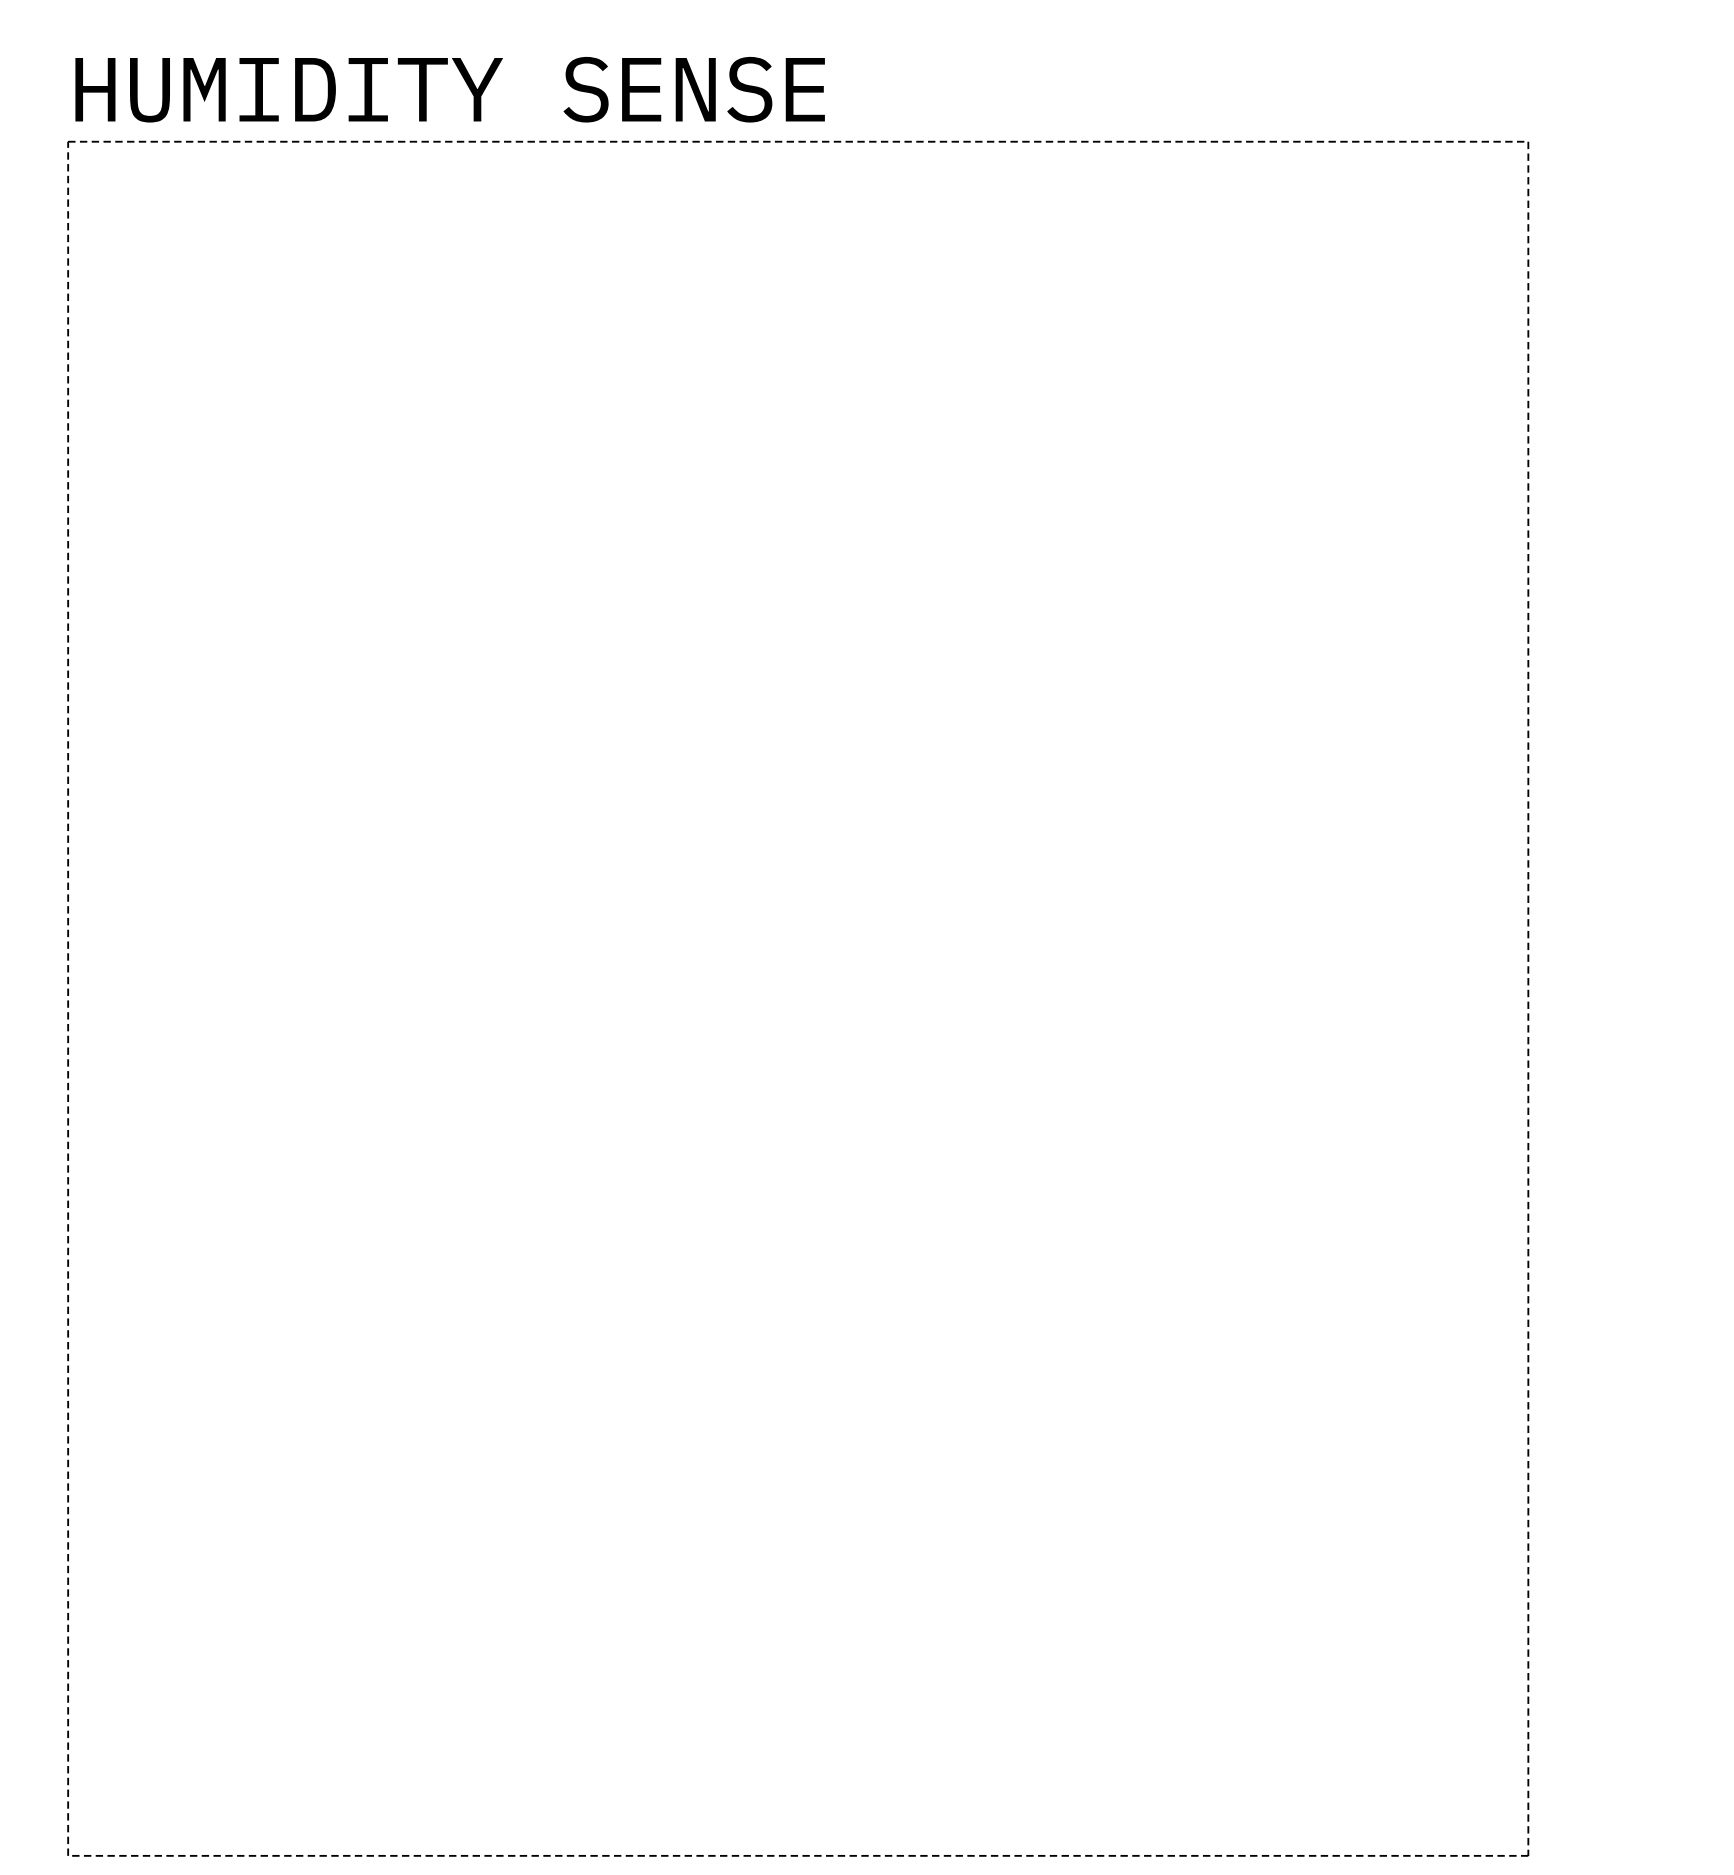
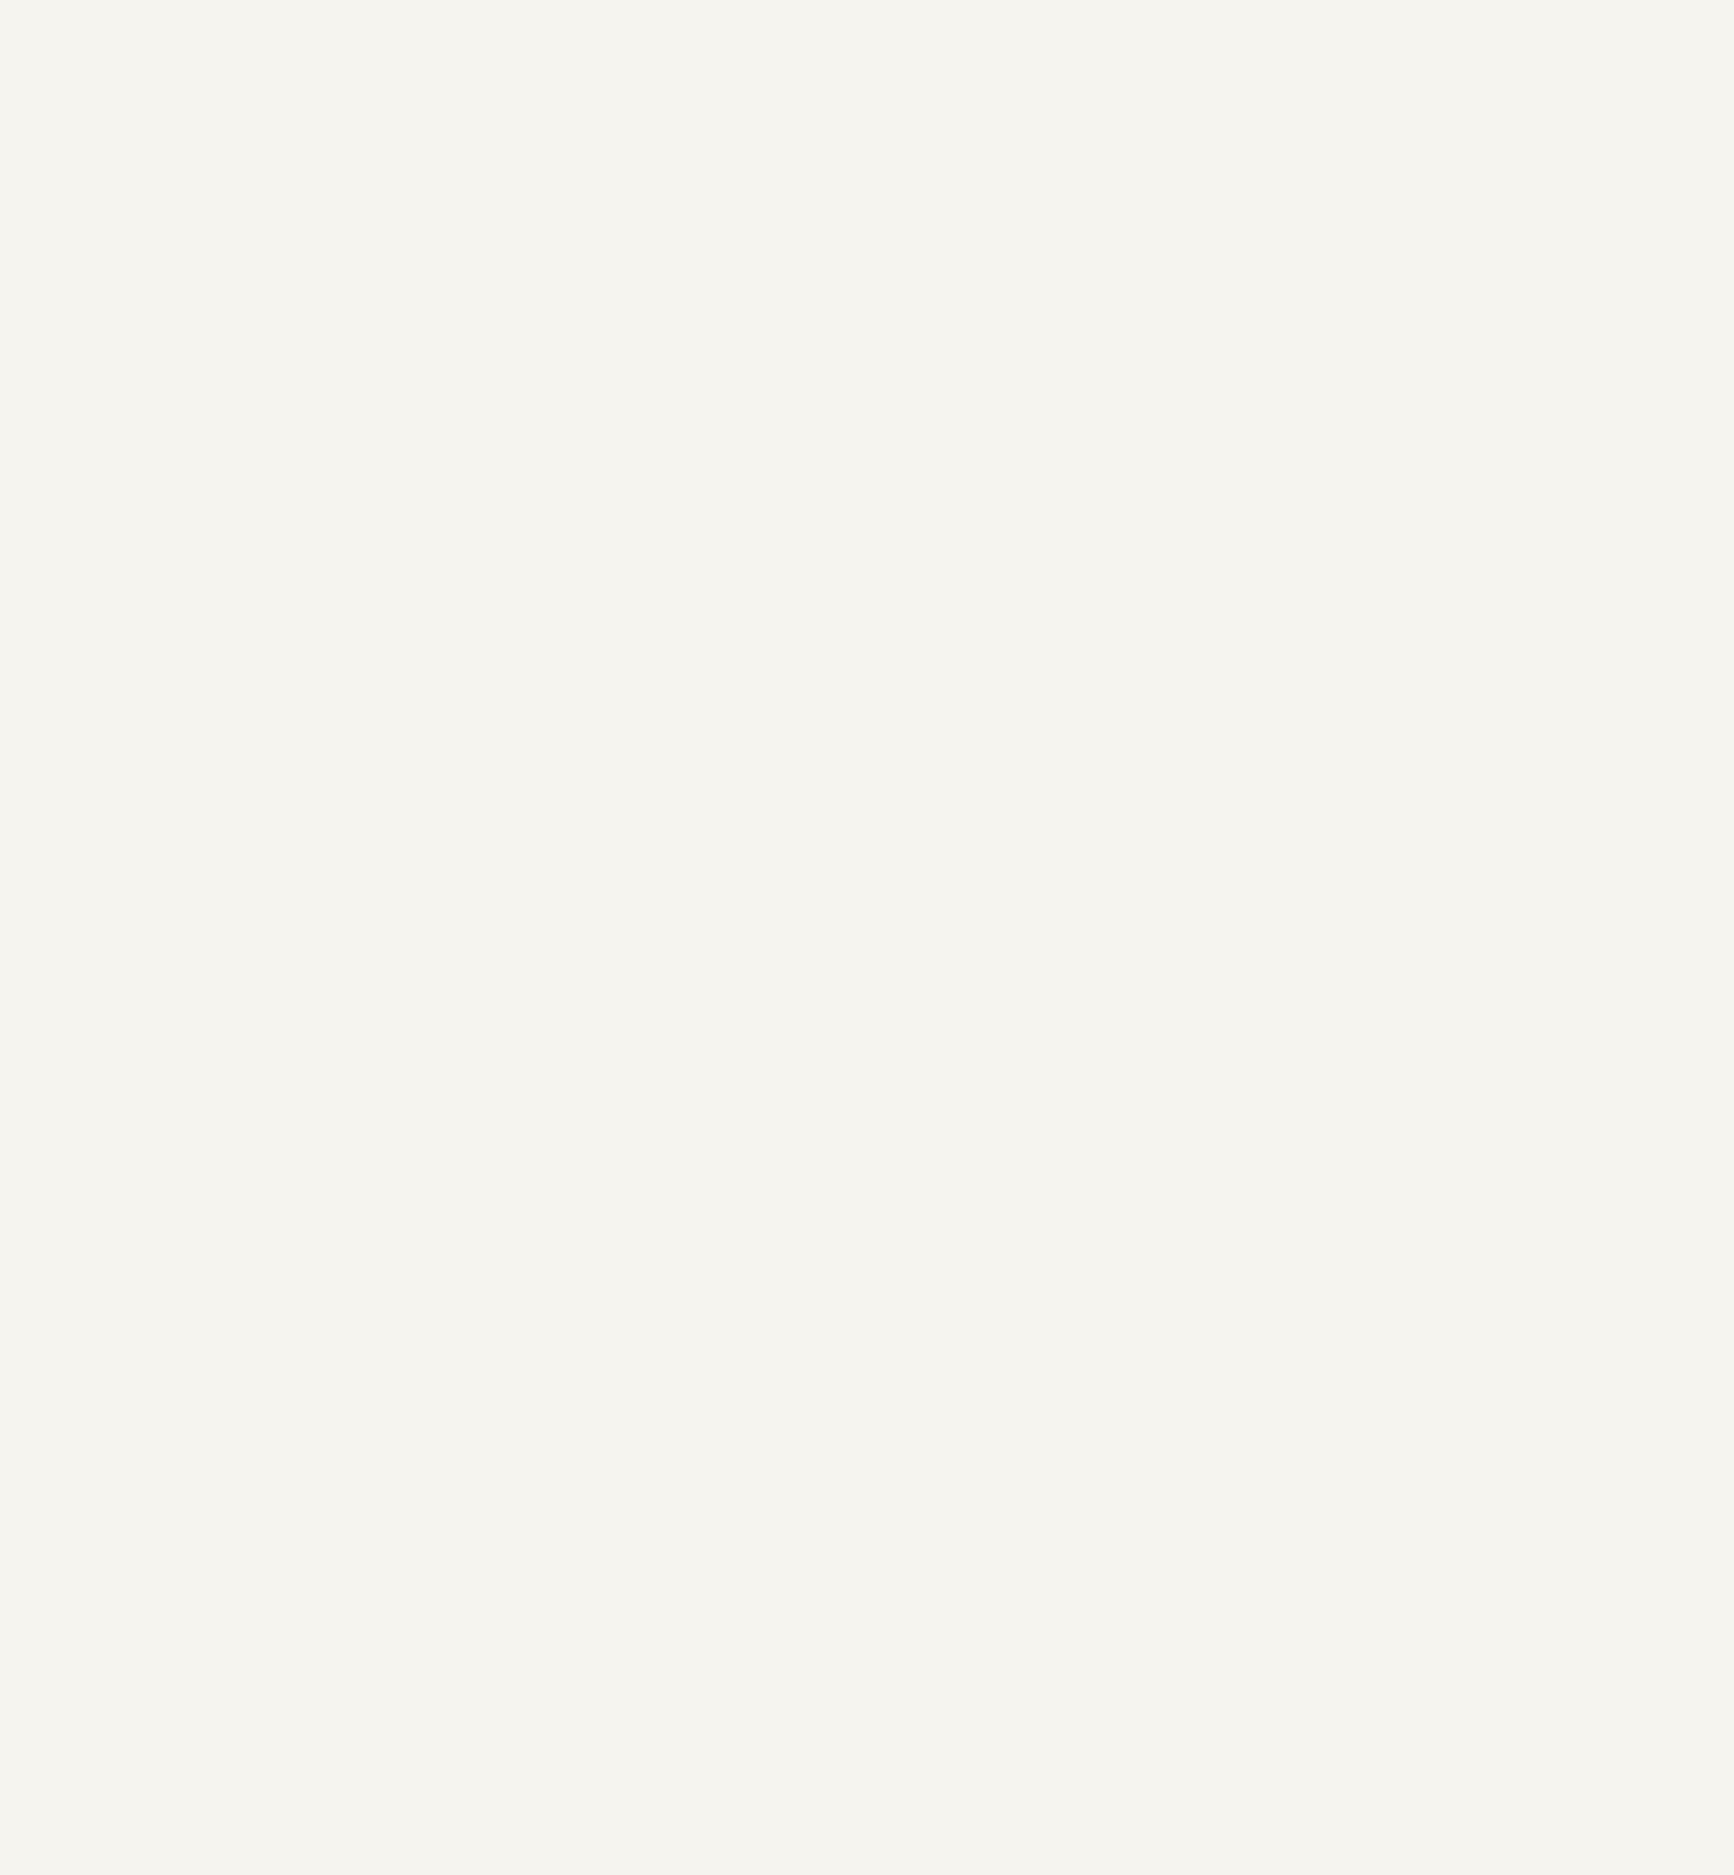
text: HUMIDITY SENSE (450, 89) -> none
line: (68, 141) (1528, 141) (1528, 1855) (68, 1855) (68, 141) -> none

